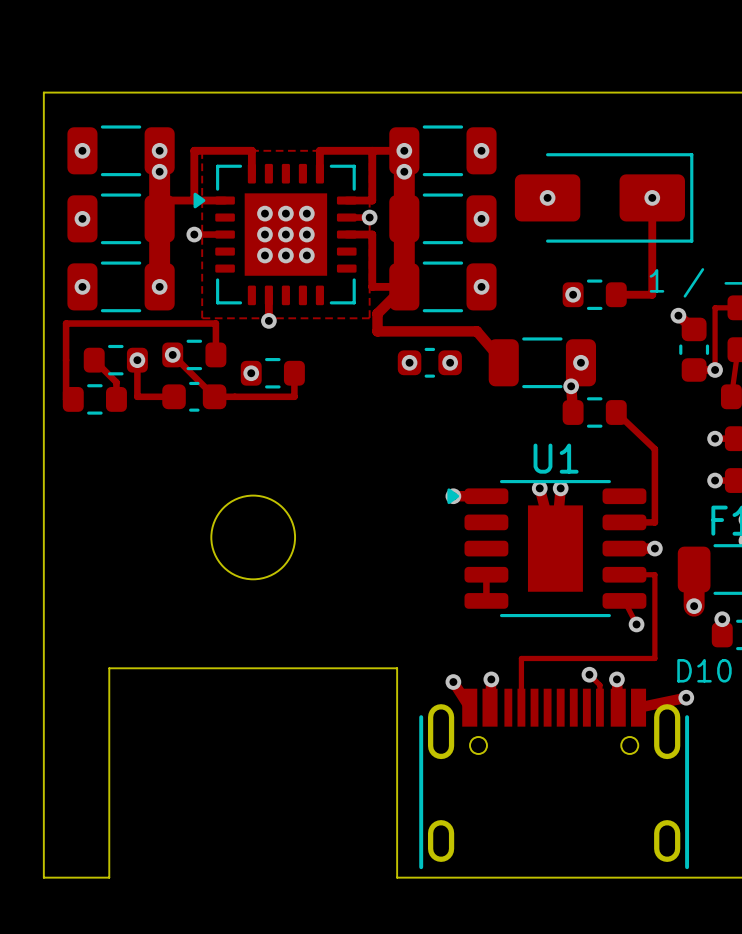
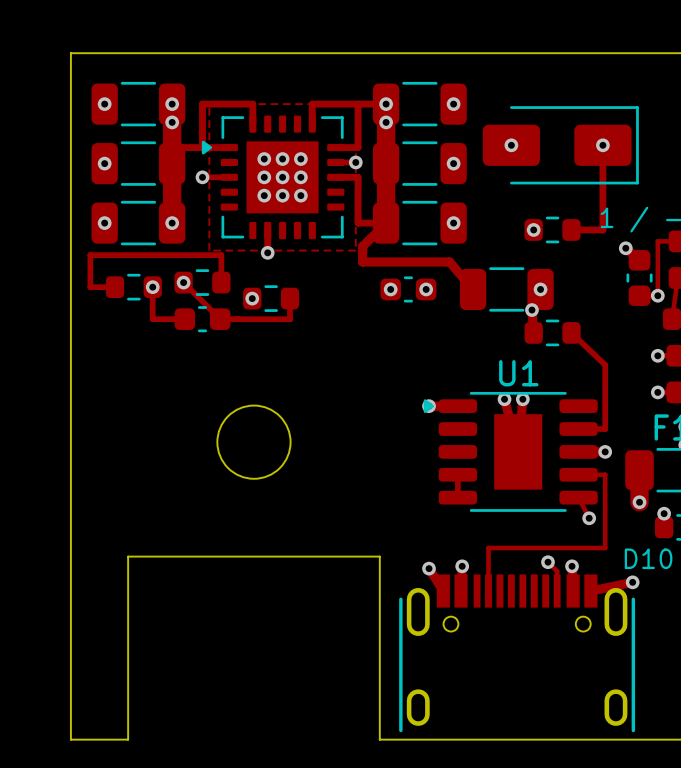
track: (66, 360) (66, 399) (73, 399) -> (90, 287) (114, 287)
track: (94, 360) (116, 382) (116, 399) -> none
part: (94, 399) -> none

